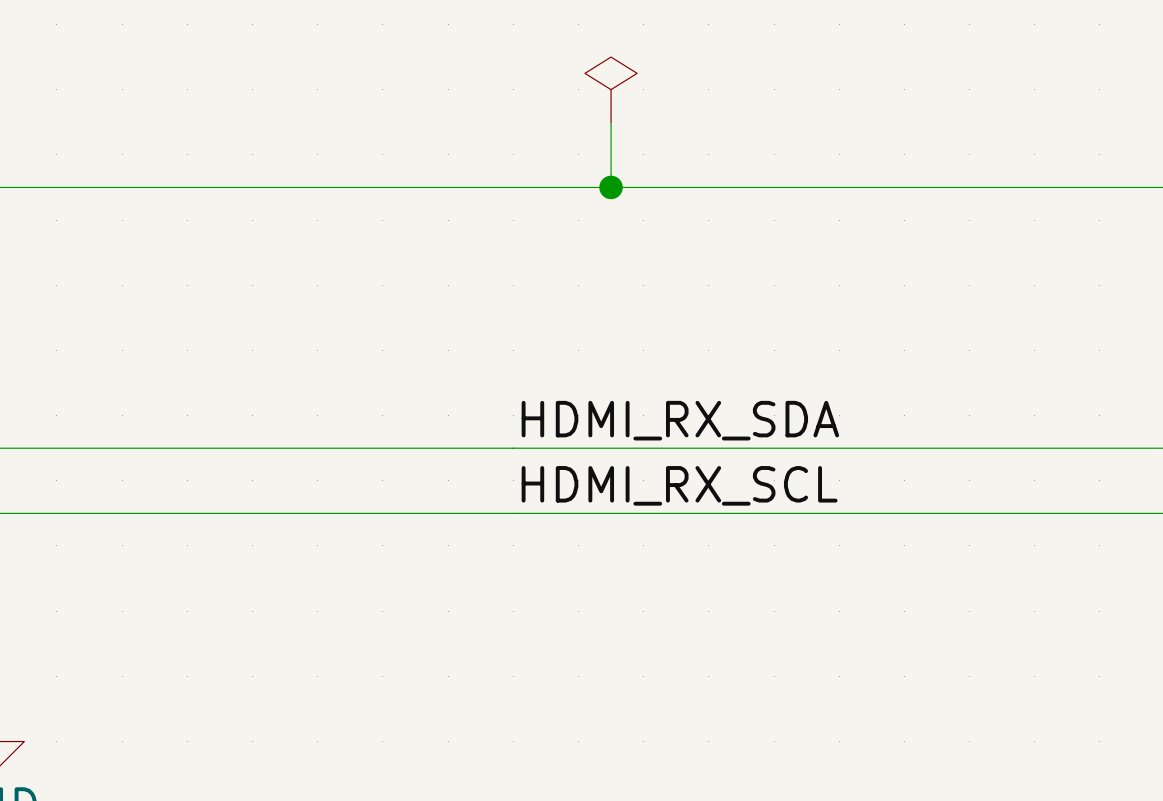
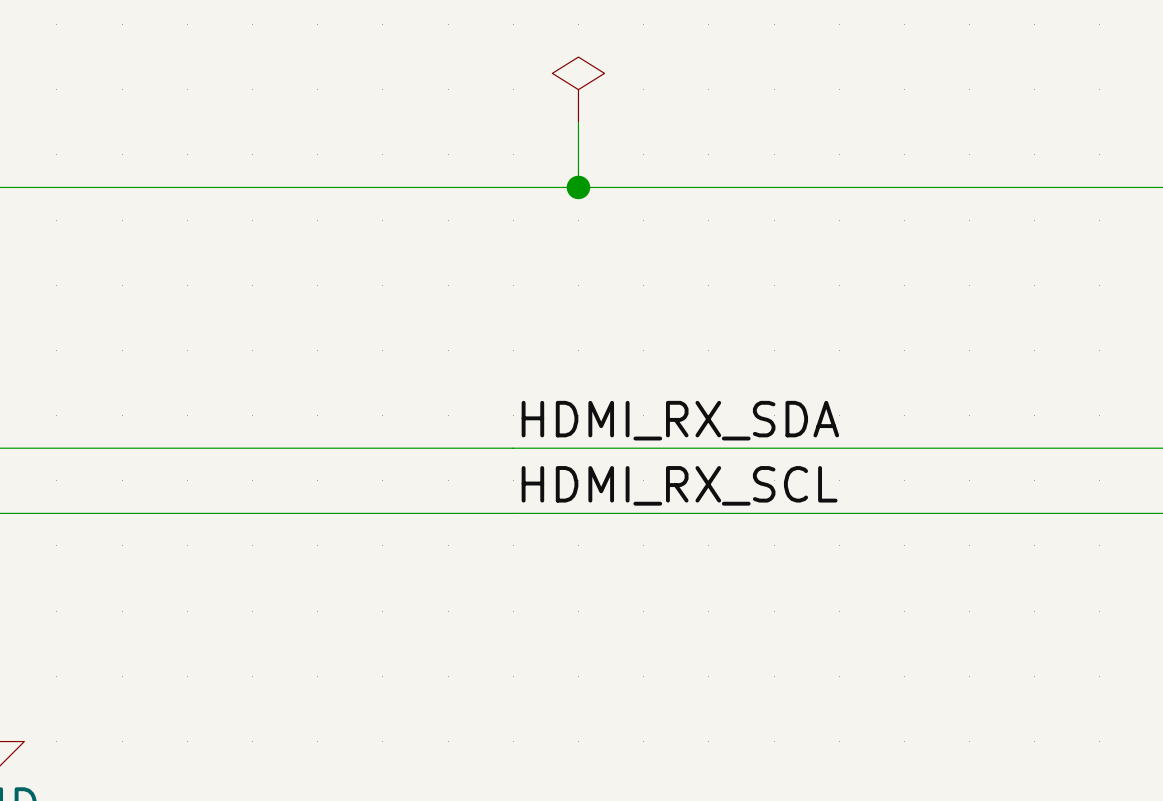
power symbol position: (611, 89) -> (578, 89)
wire: (611, 122) (611, 187) -> (578, 122) (578, 187)
junction position: (611, 187) -> (578, 187)

